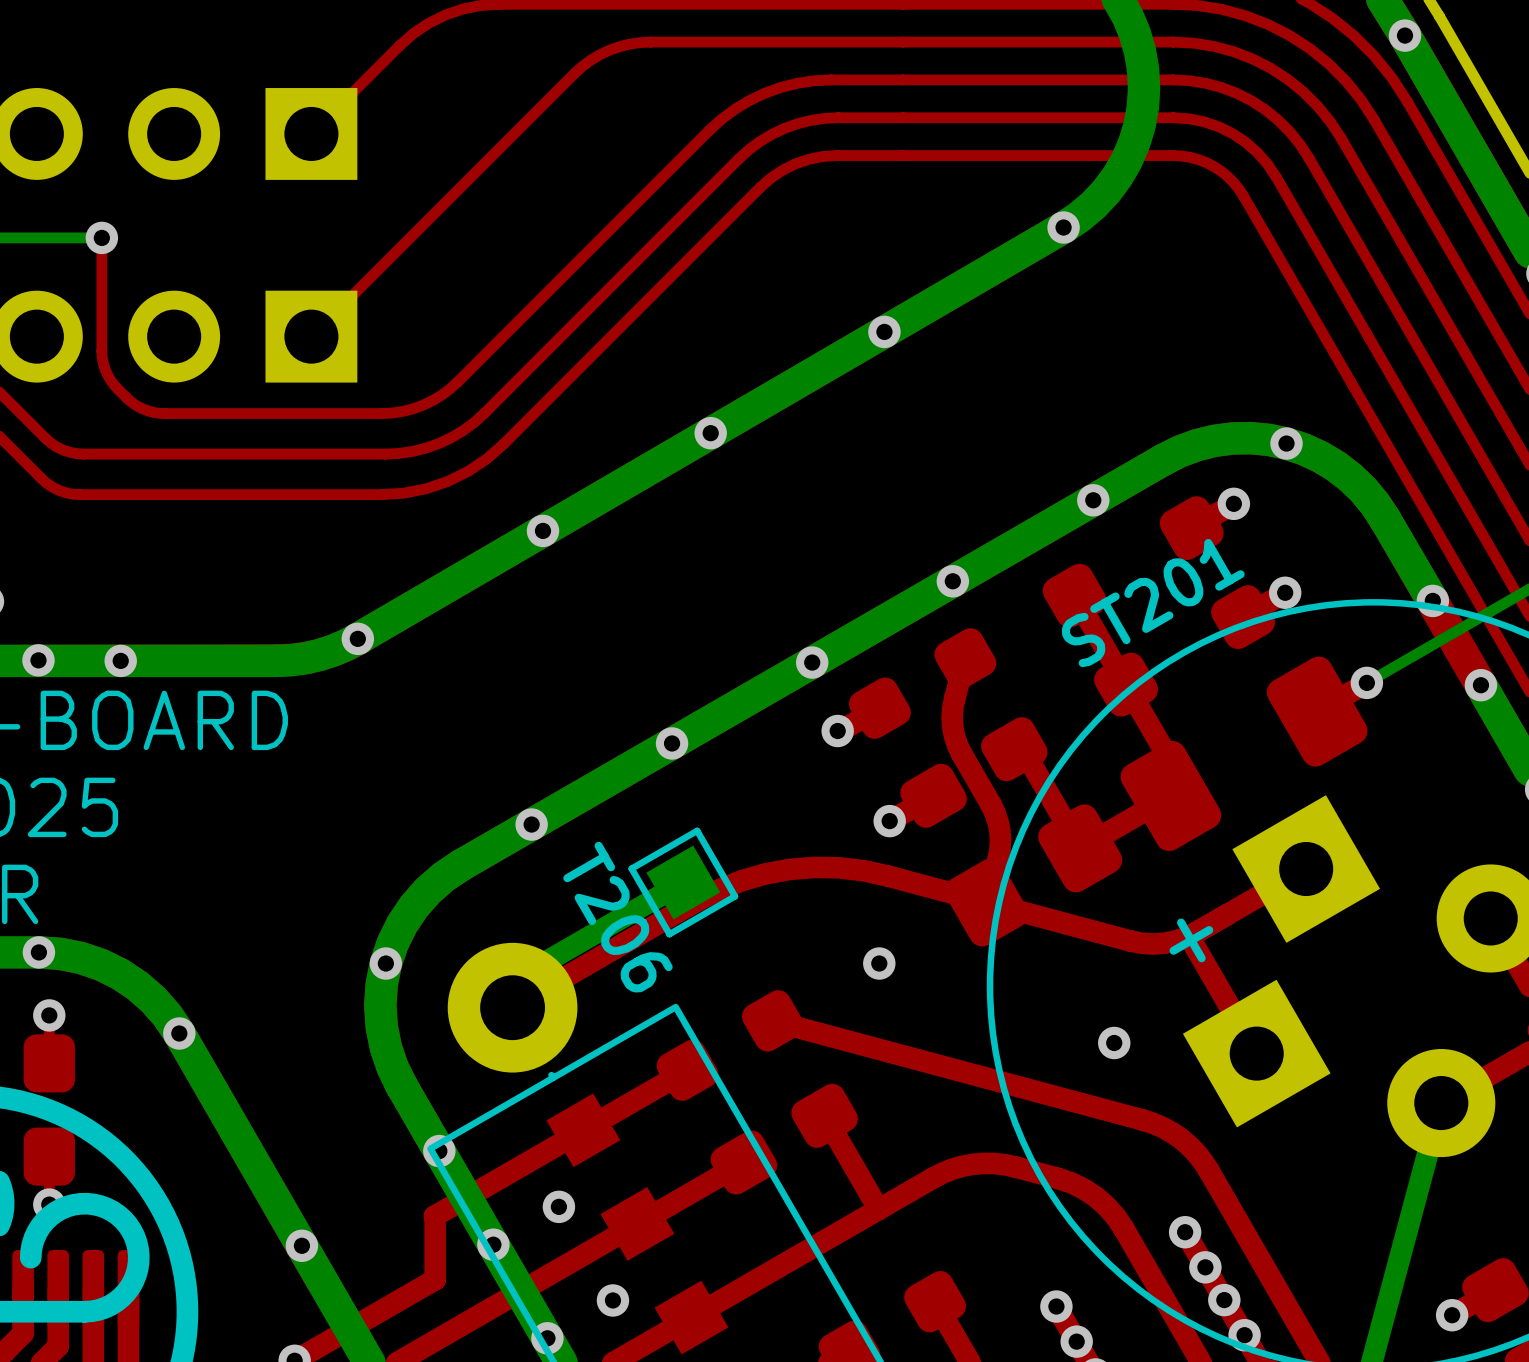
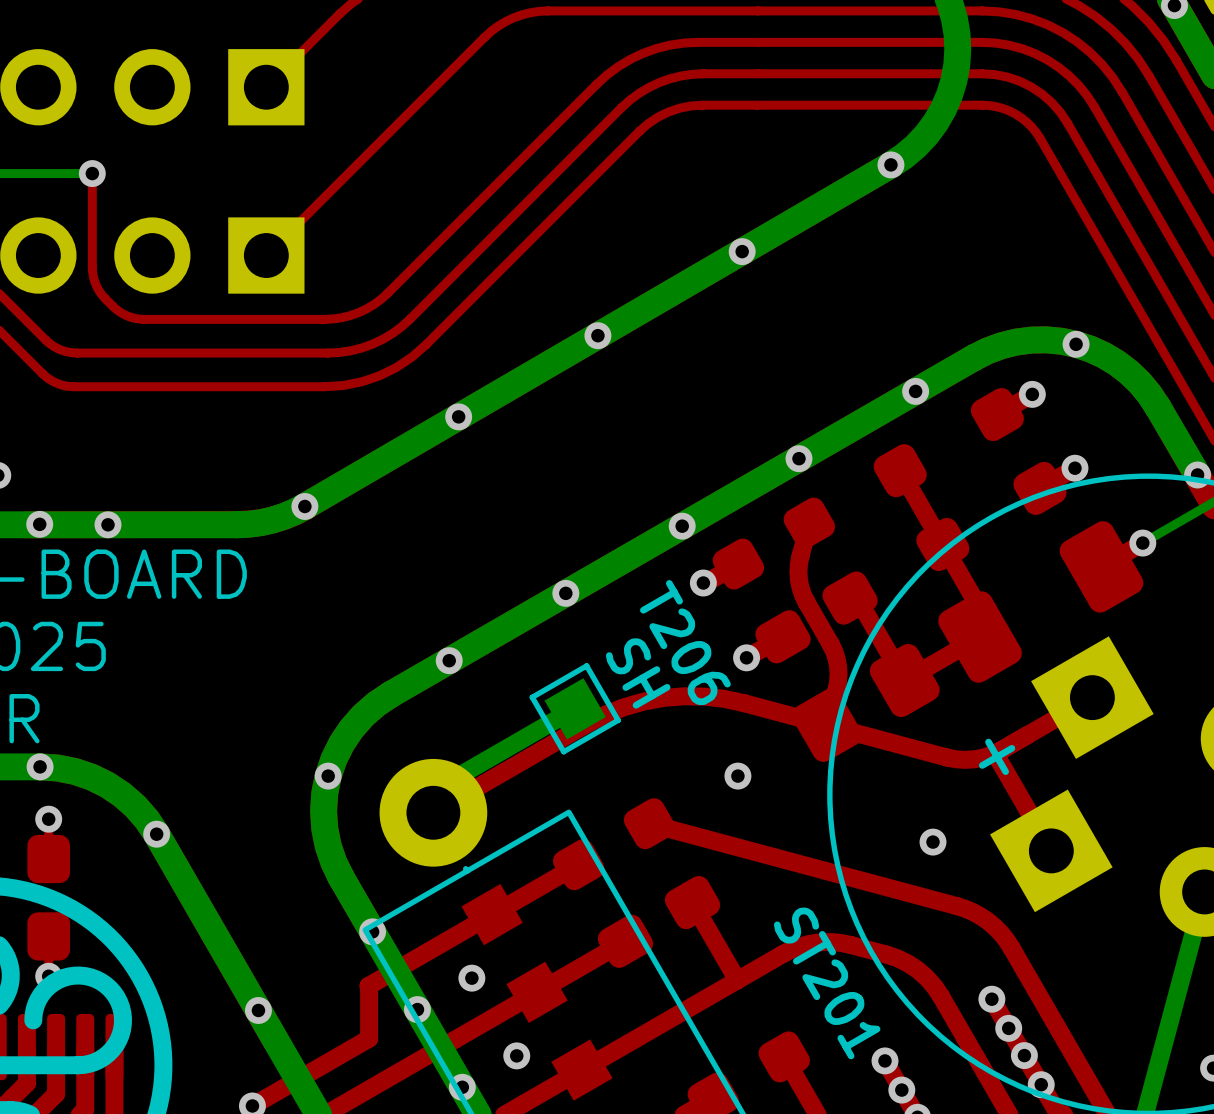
ST201 name rotation: 0° (1153, 603) -> 90° clockwise (827, 983)
ST201 name position: ST201 (1153, 603) -> ST201 (827, 983)
T206 text: none -> SH (638, 673)
T206 name position: T206 (618, 917) -> T206 (685, 642)

